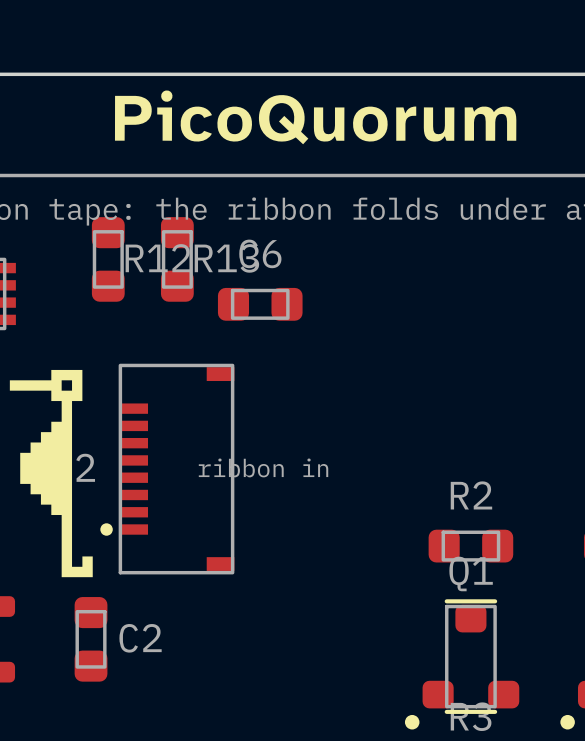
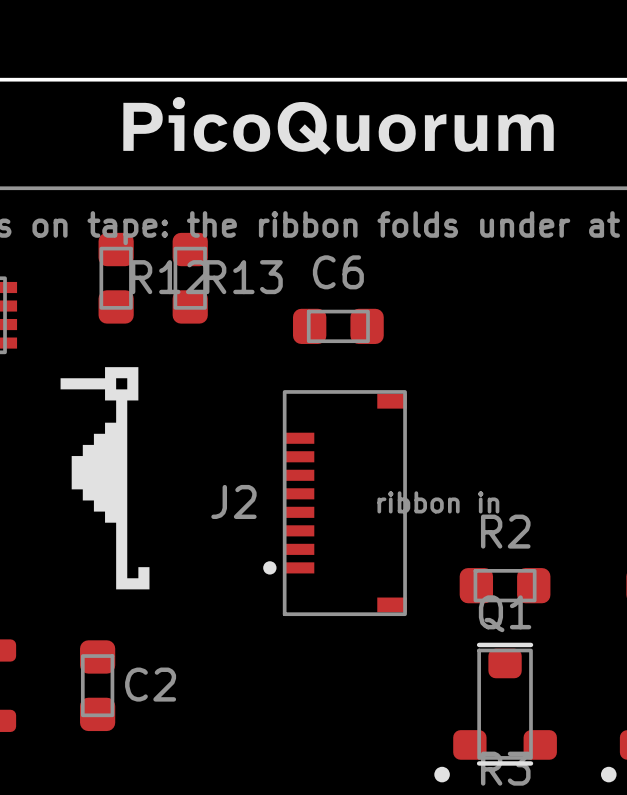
C6 position: (260, 304) -> (338, 326)
drawing: none -> [82, 367, 139, 523]
drawing: [30, 369, 83, 516] -> none
drawing position: (35, 385) -> (88, 383)
drawing position: (66, 411) -> (121, 411)
drawing position: (46, 468) -> (99, 472)
J2 position: (167, 469) -> (335, 503)
drawing: none -> [116, 578, 150, 590]
drawing position: (66, 540) -> (121, 550)
drawing position: (87, 561) -> (143, 572)
drawing: [61, 566, 93, 578] -> none

